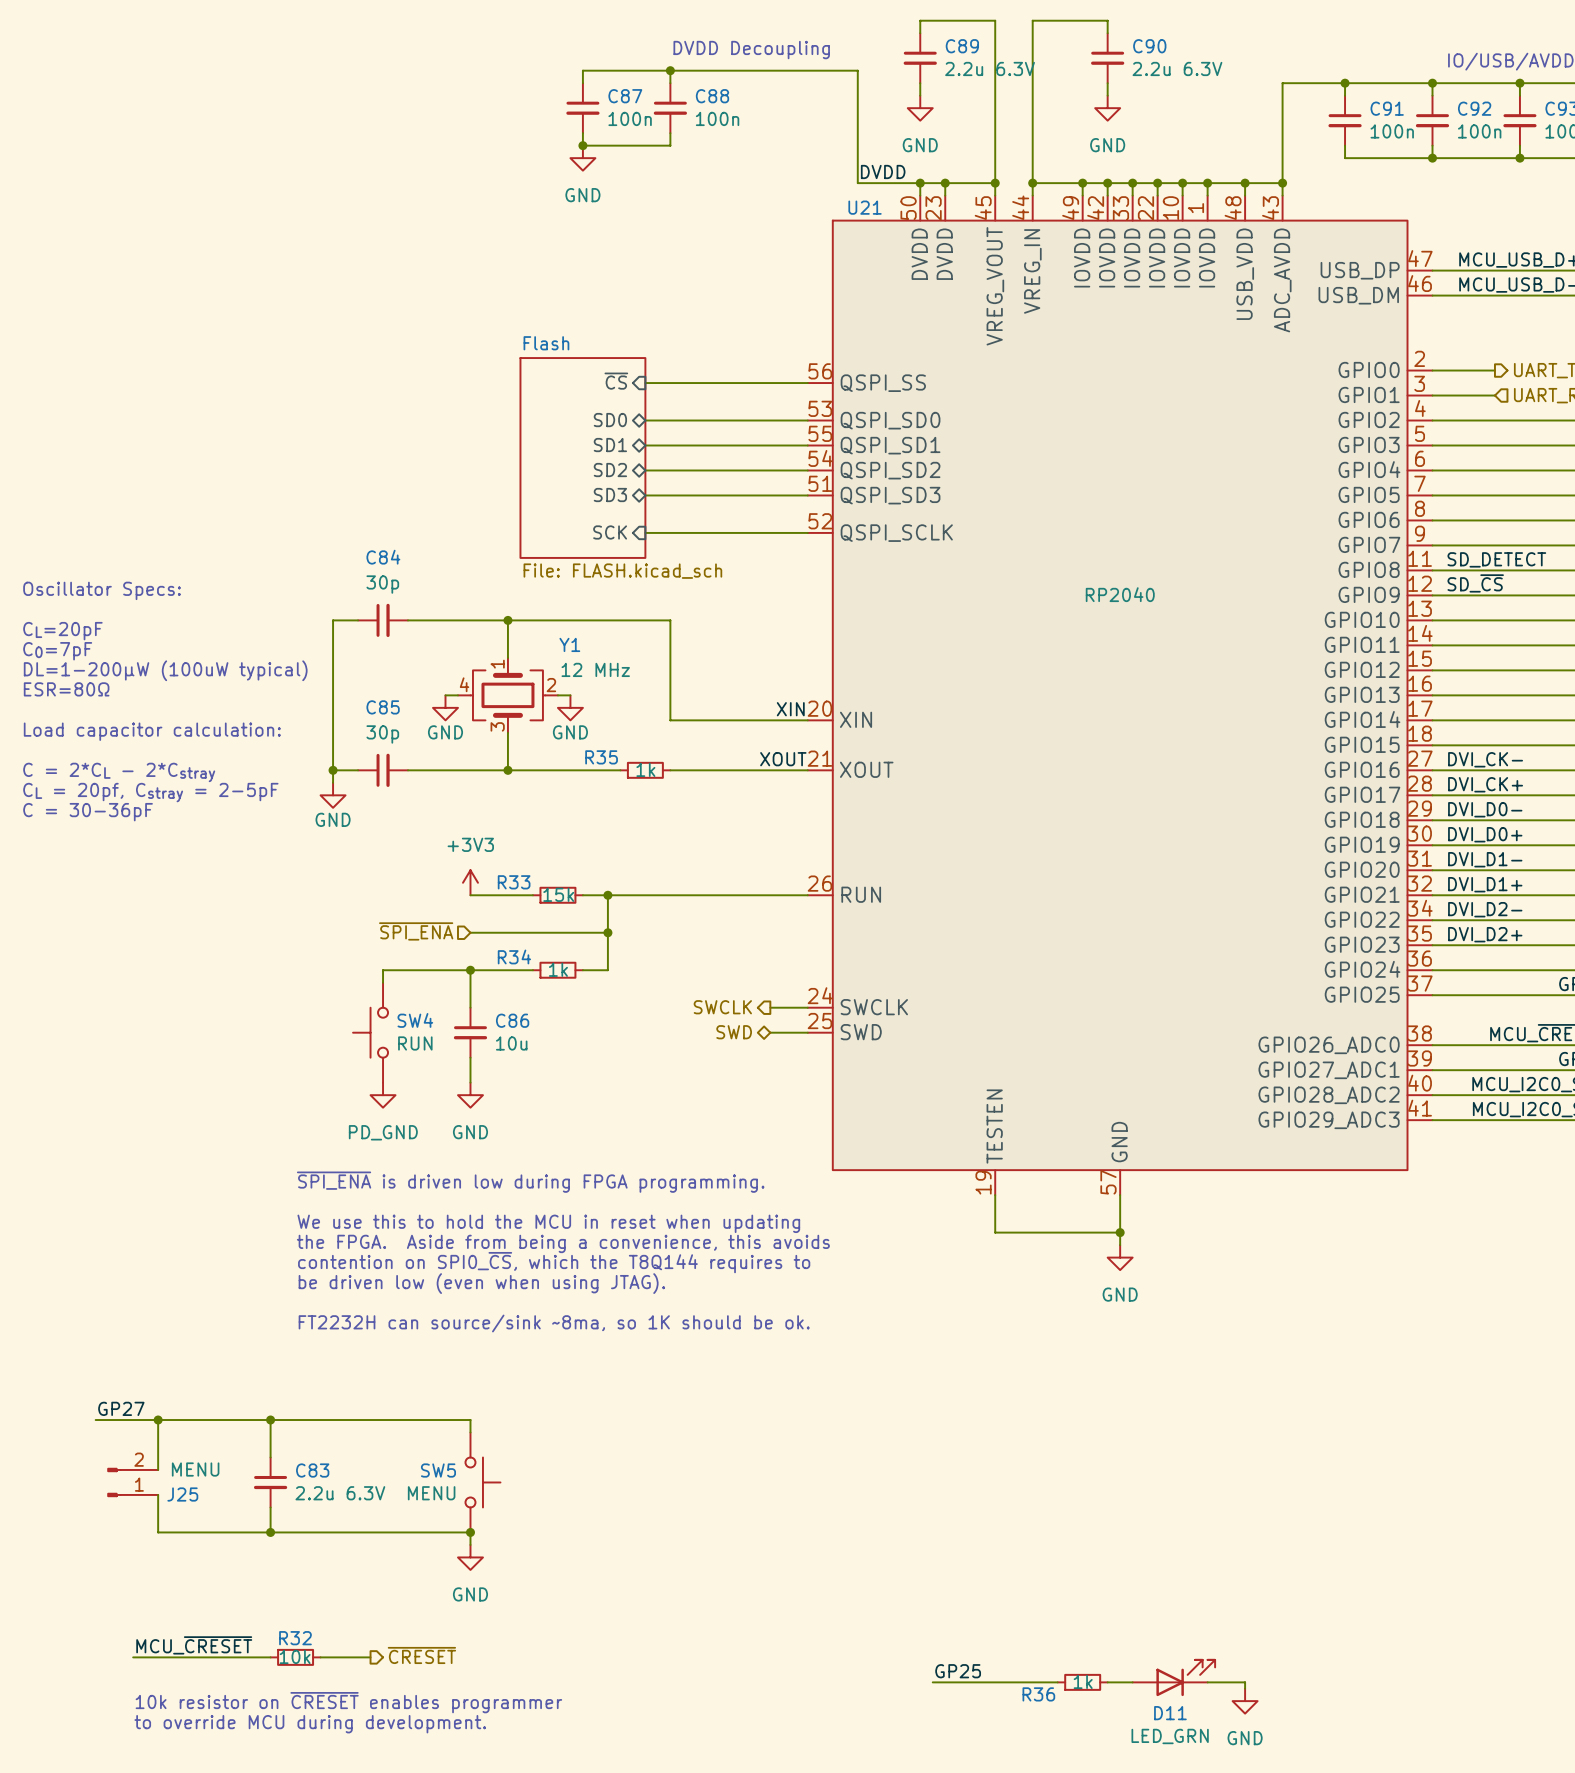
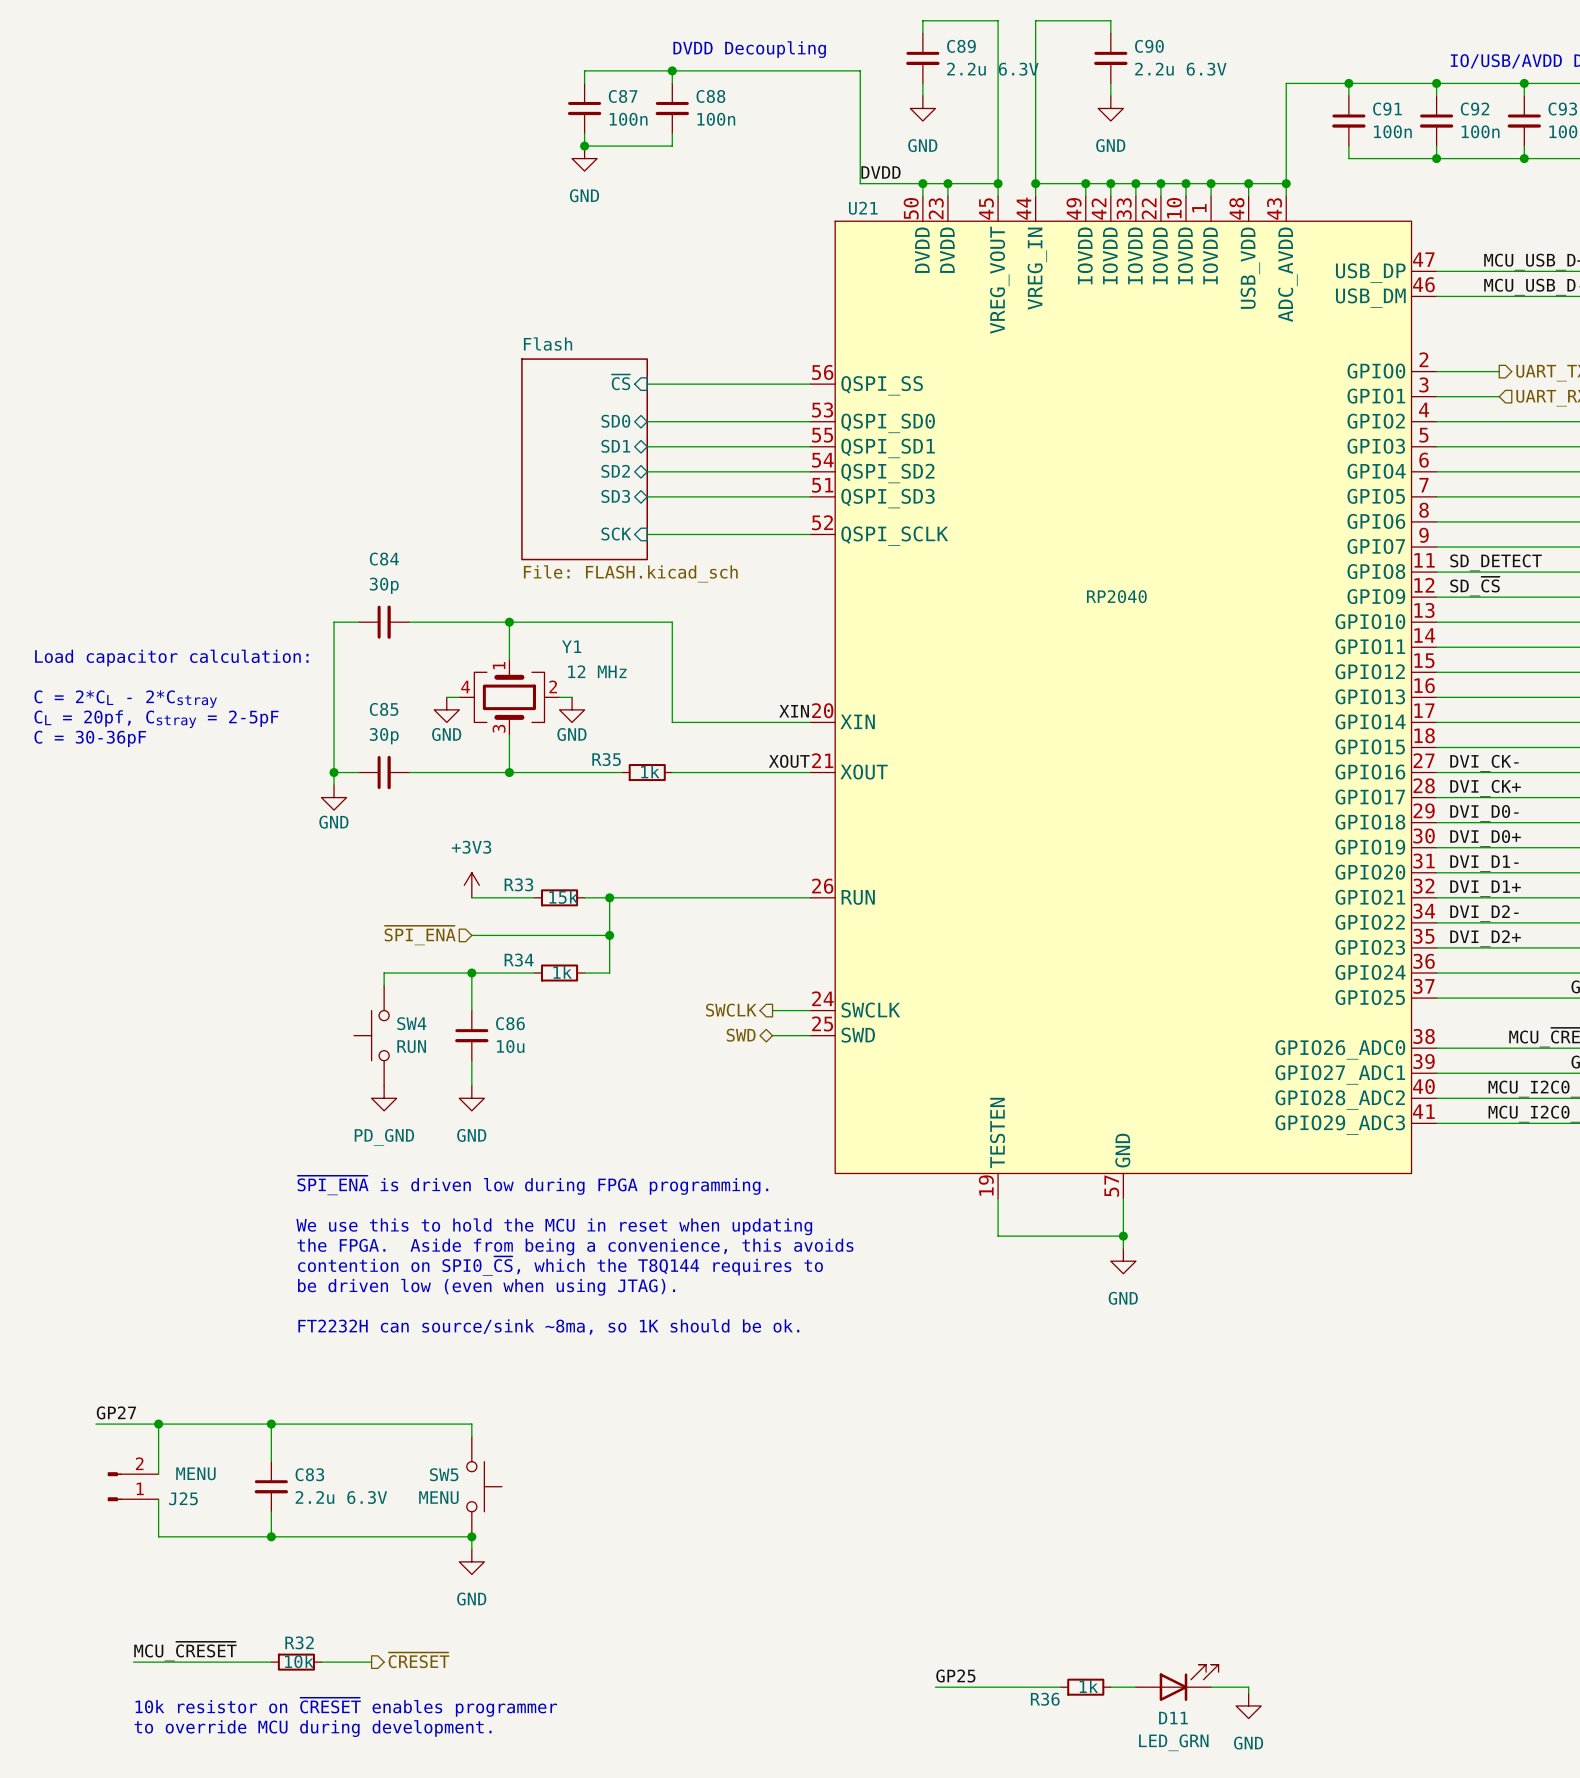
text: Oscillator Specs: (102, 590) -> none
text: CL=20pF (62, 631) -> none
text: C0=7pF (57, 651) -> none
text: DL=1-200μW (100uW typical) (165, 670) -> none
text: ESR=80Ω (66, 689) -> none
text position: Load capacitor calculation: (152, 731) -> Load capacitor calculation: (171, 658)
text position: C = 2*CL - 2*Cstray (119, 772) -> C = 2*CL - 2*Cstray (125, 699)
text position: CL = 20pf, Cstray = 2-5pF (150, 792) -> CL = 20pf, Cstray = 2-5pF (156, 719)
text position: C = 30-36pF (88, 812) -> C = 30-36pF (90, 738)

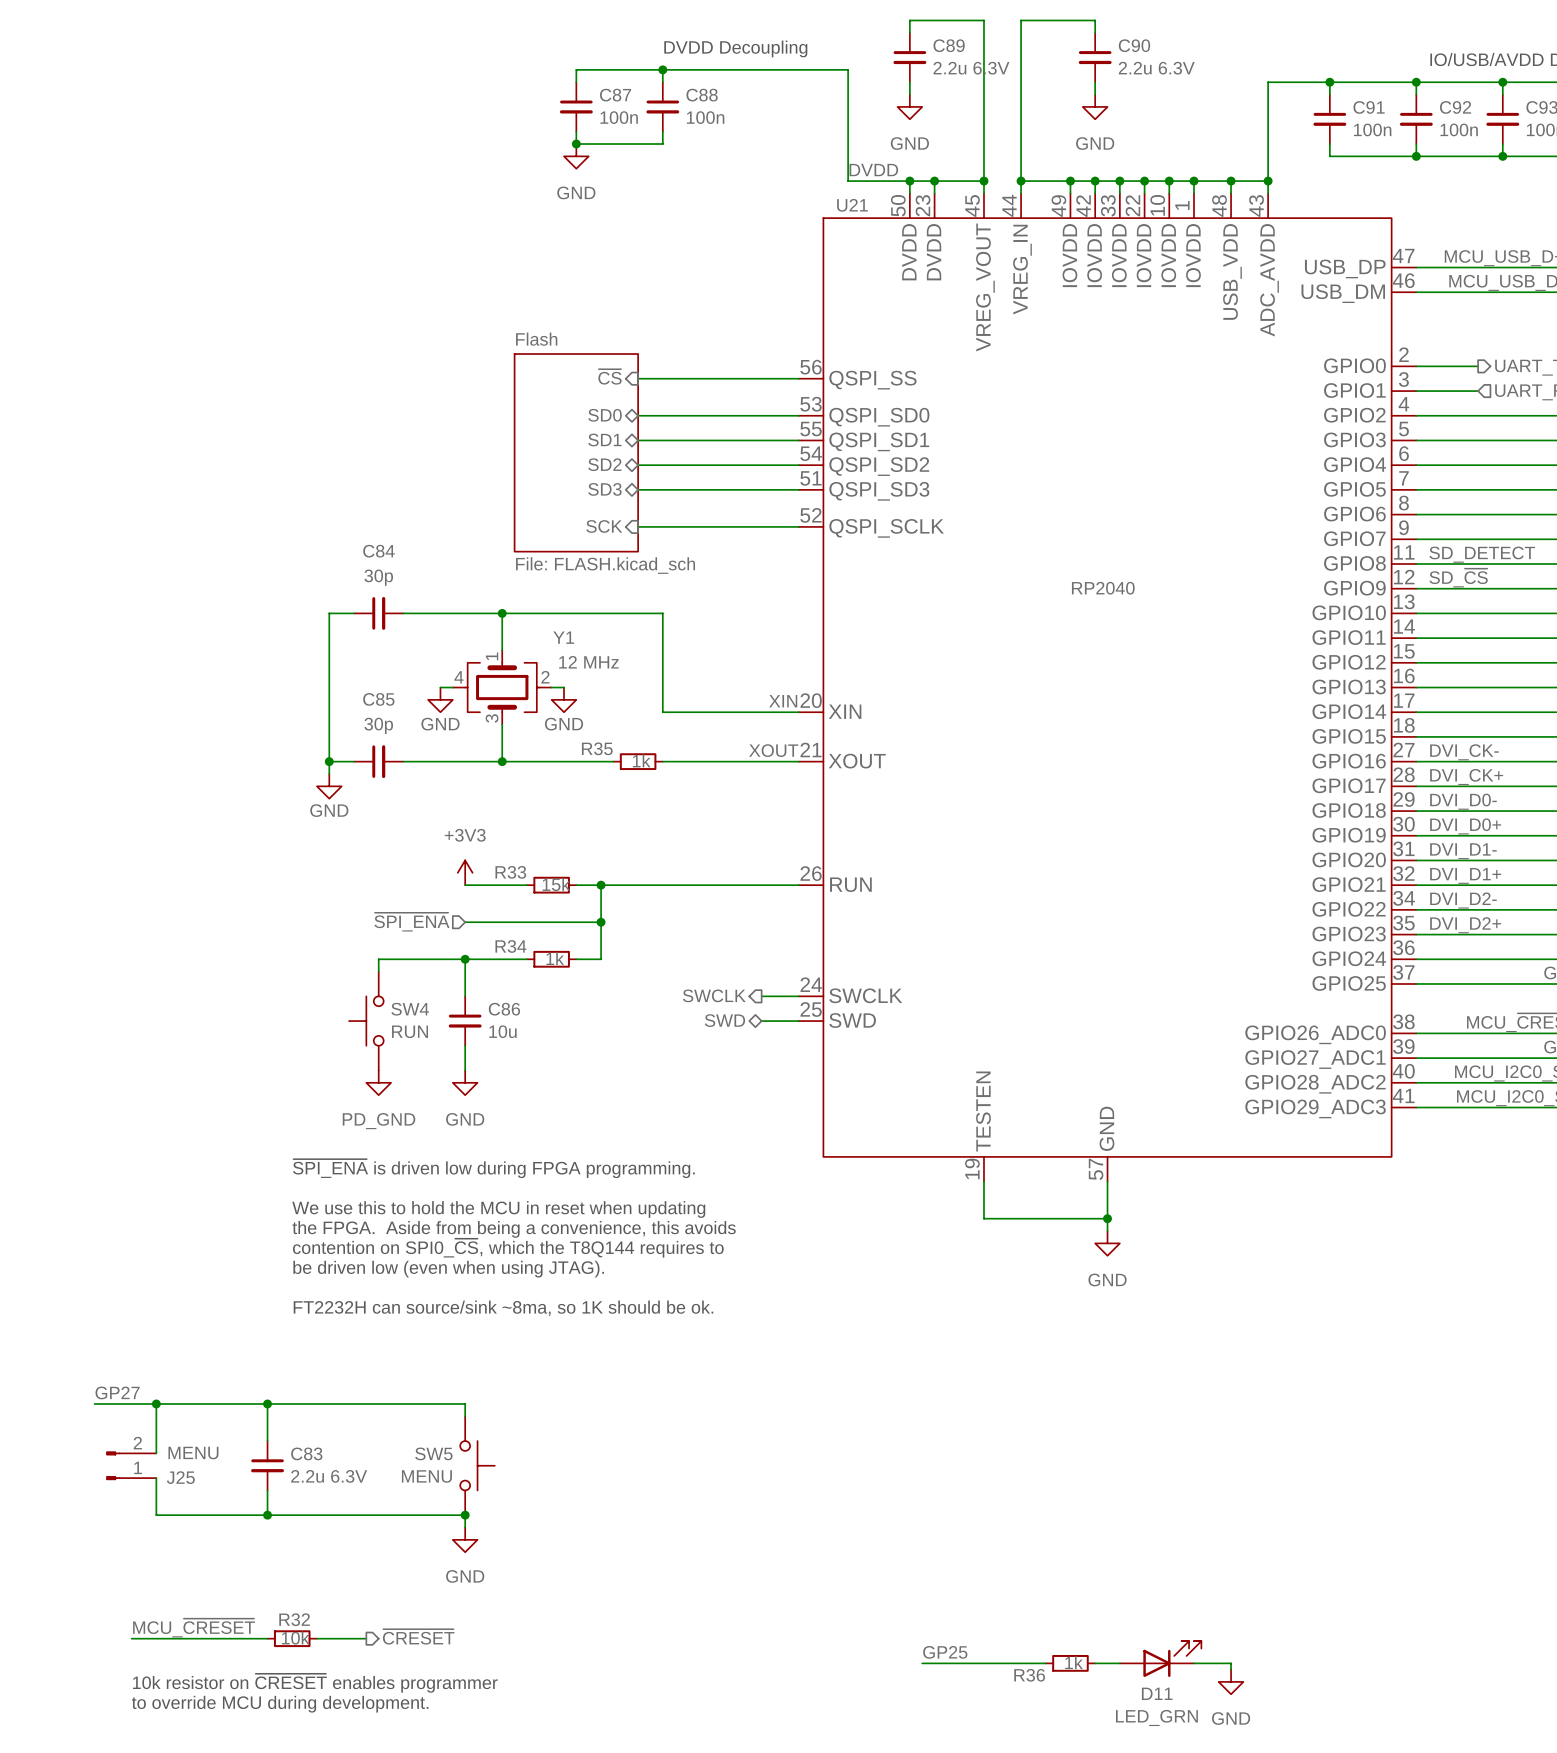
text: Load capacitor calculation: (171, 658) -> none
text: C = 2*CL - 2*Cstray (125, 699) -> none
text: CL = 20pf, Cstray = 2-5pF (156, 719) -> none
text: C = 30-36pF (90, 738) -> none

